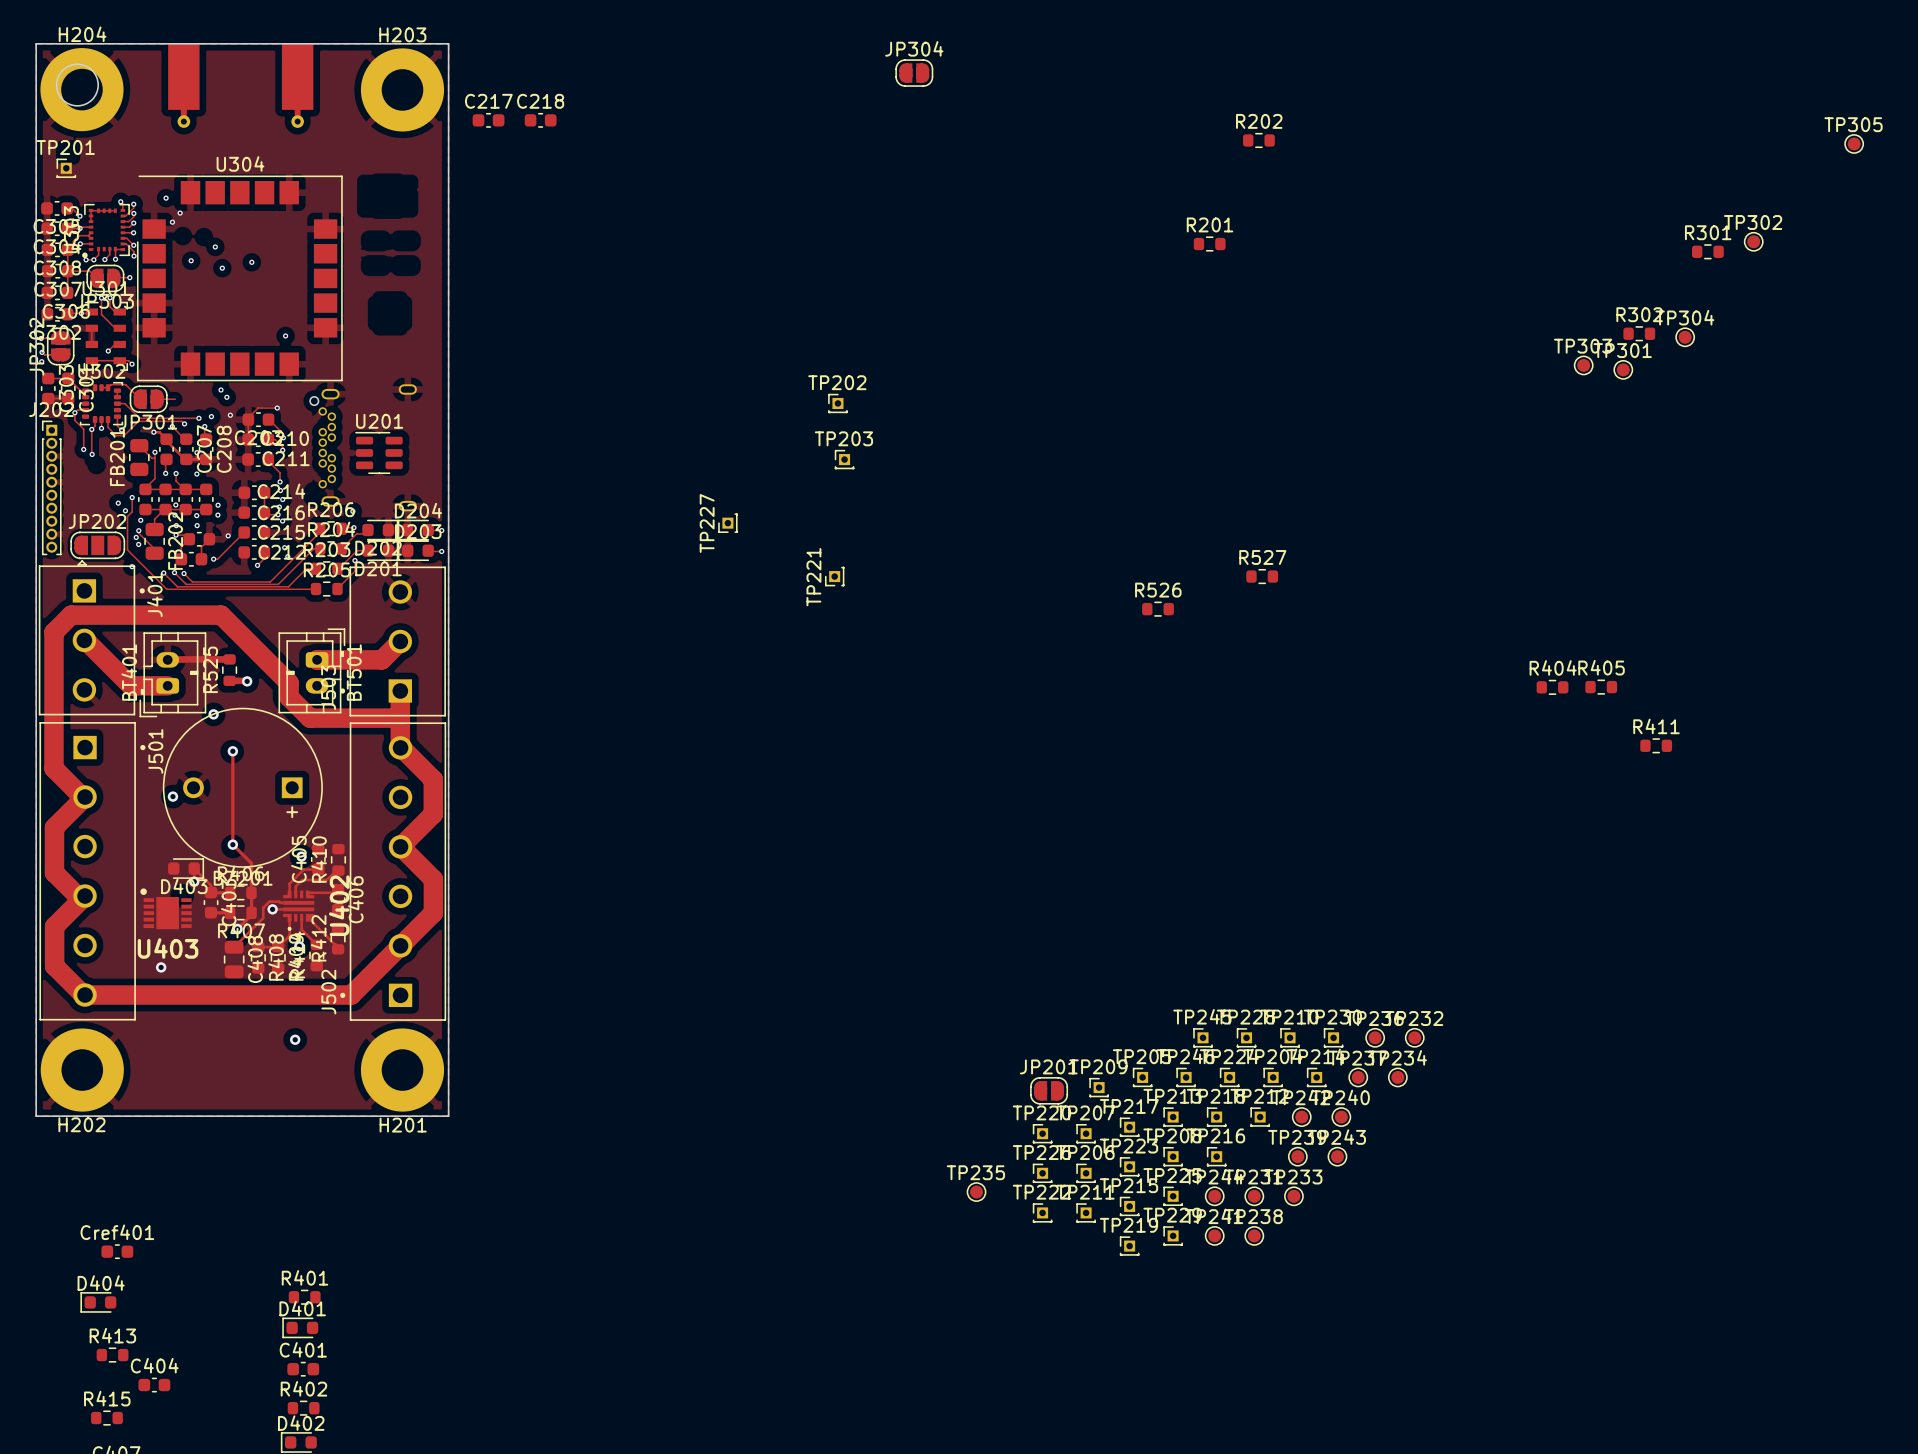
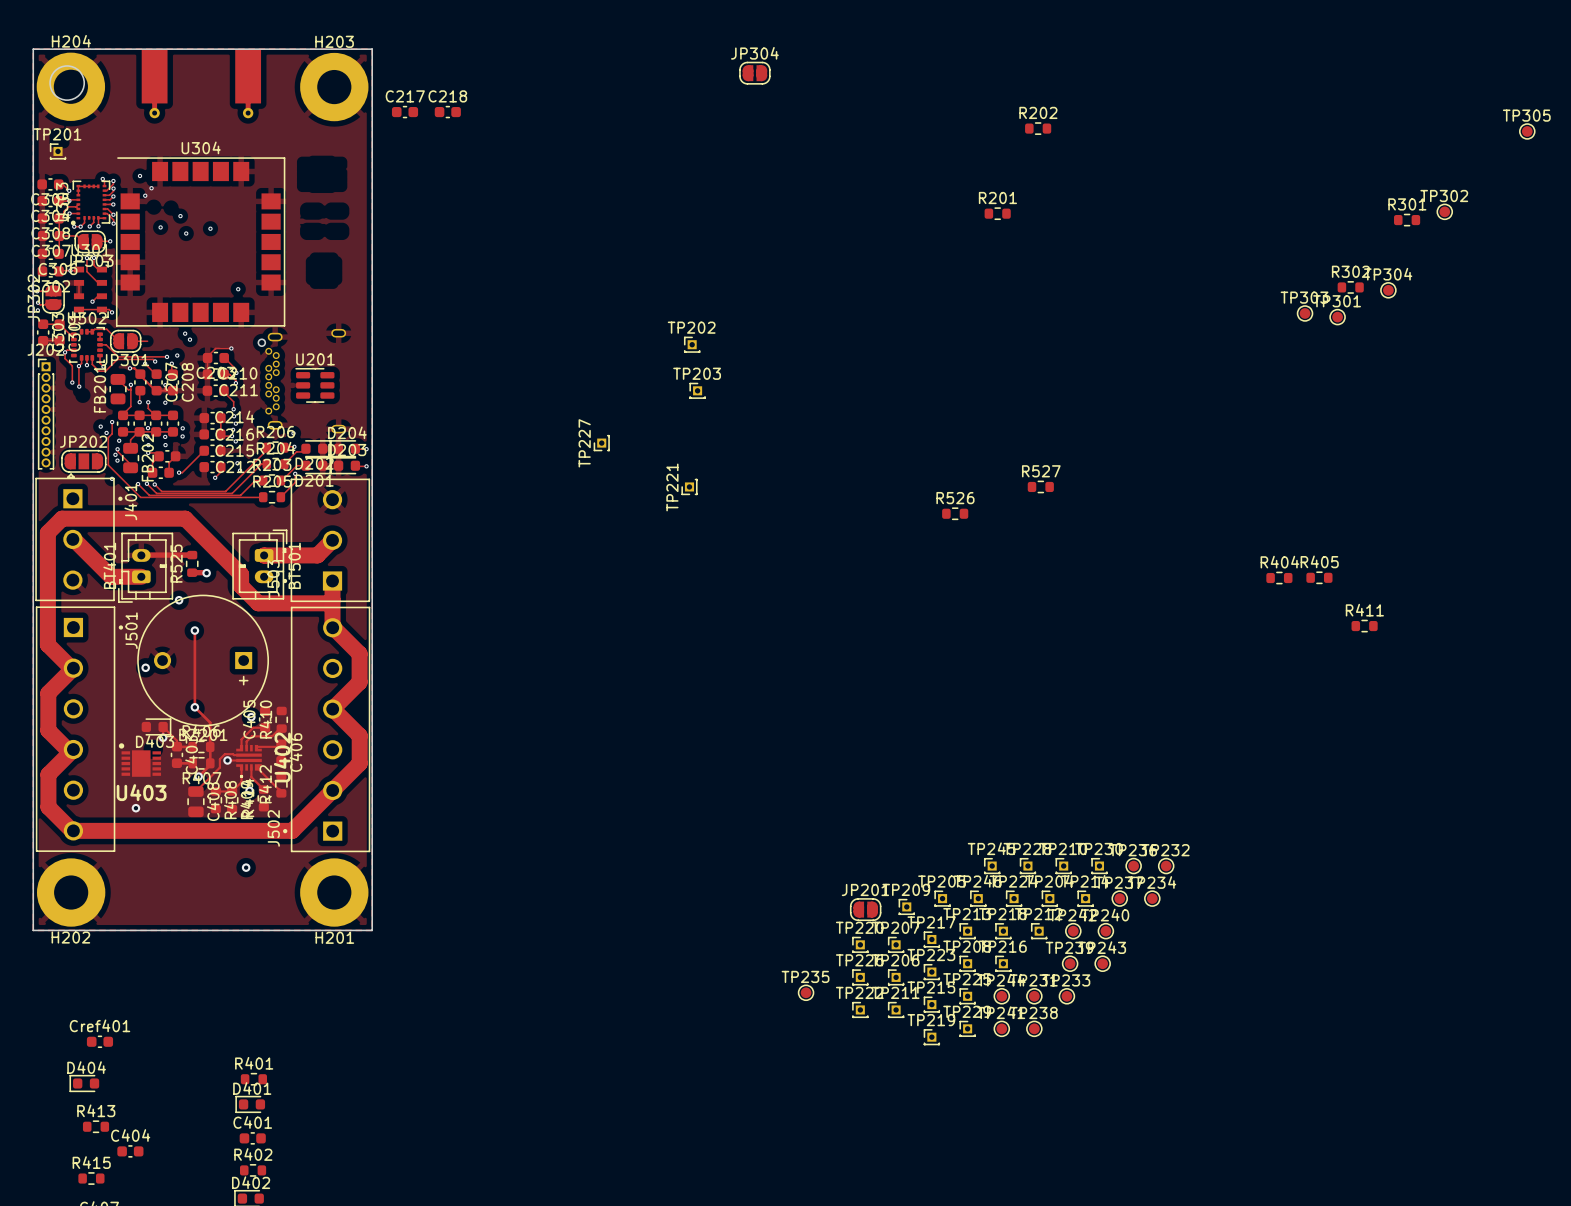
via: (230, 415) -> none
via: (228, 535) -> none

